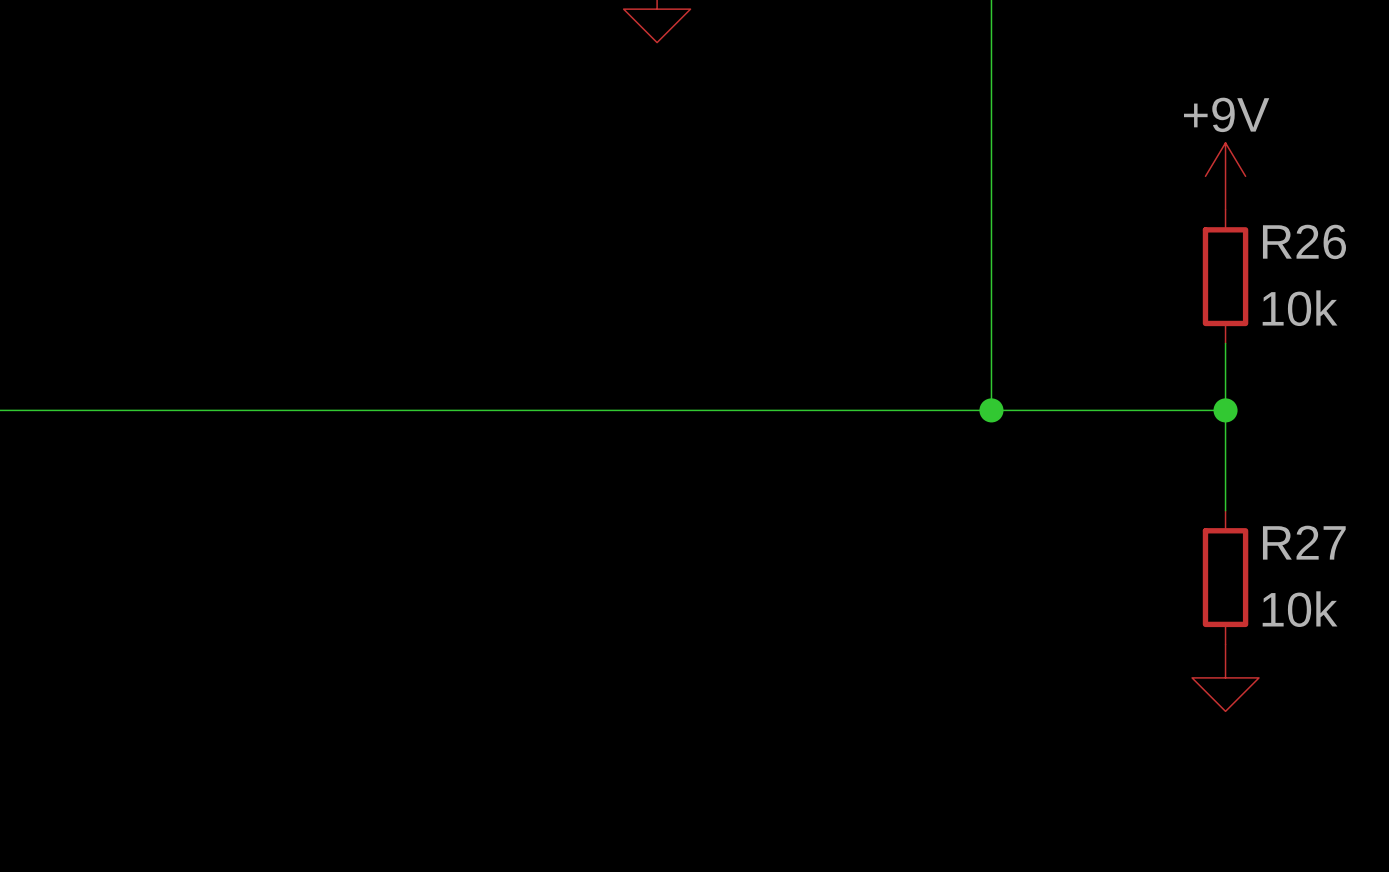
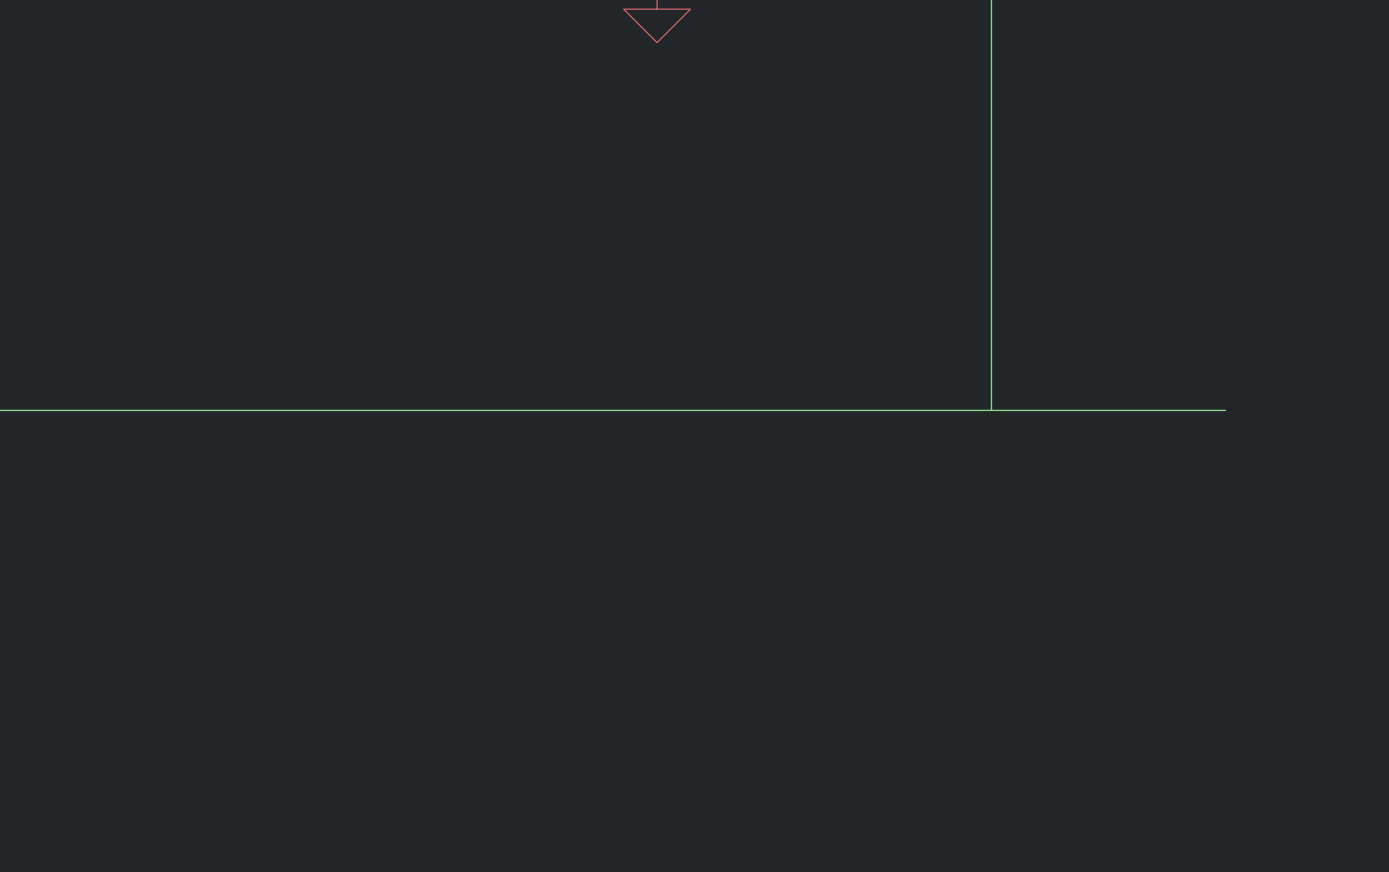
power symbol: +9V (1225, 176) -> none
R26: 10k (1225, 276) -> none
wire: (1225, 343) (1225, 510) -> none
junction: (991, 410) -> none
junction: (1225, 410) -> none
R27: 10k (1225, 577) -> none
power symbol: (1225, 677) -> none

